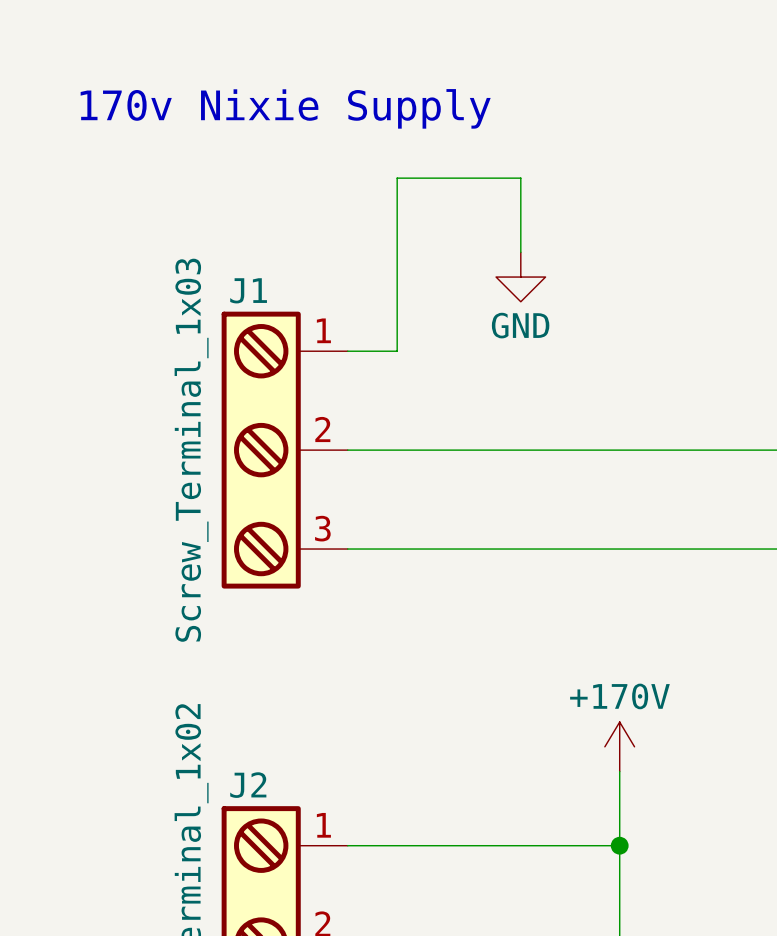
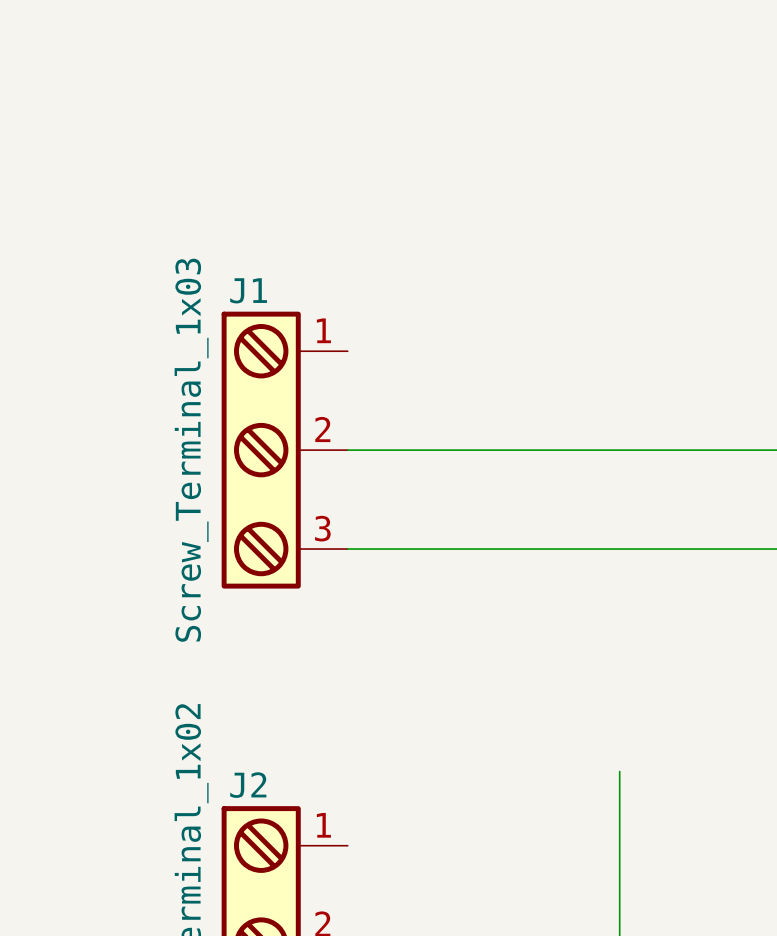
text: 170v Nixie Supply (285, 108) -> none
wire: (520, 252) (520, 178) (397, 178) (397, 351) (347, 351) -> none
power symbol: GND (520, 277) -> none
power symbol: +170V (619, 746) -> none
wire: (347, 845) (619, 845) -> none
junction: (619, 845) -> none

